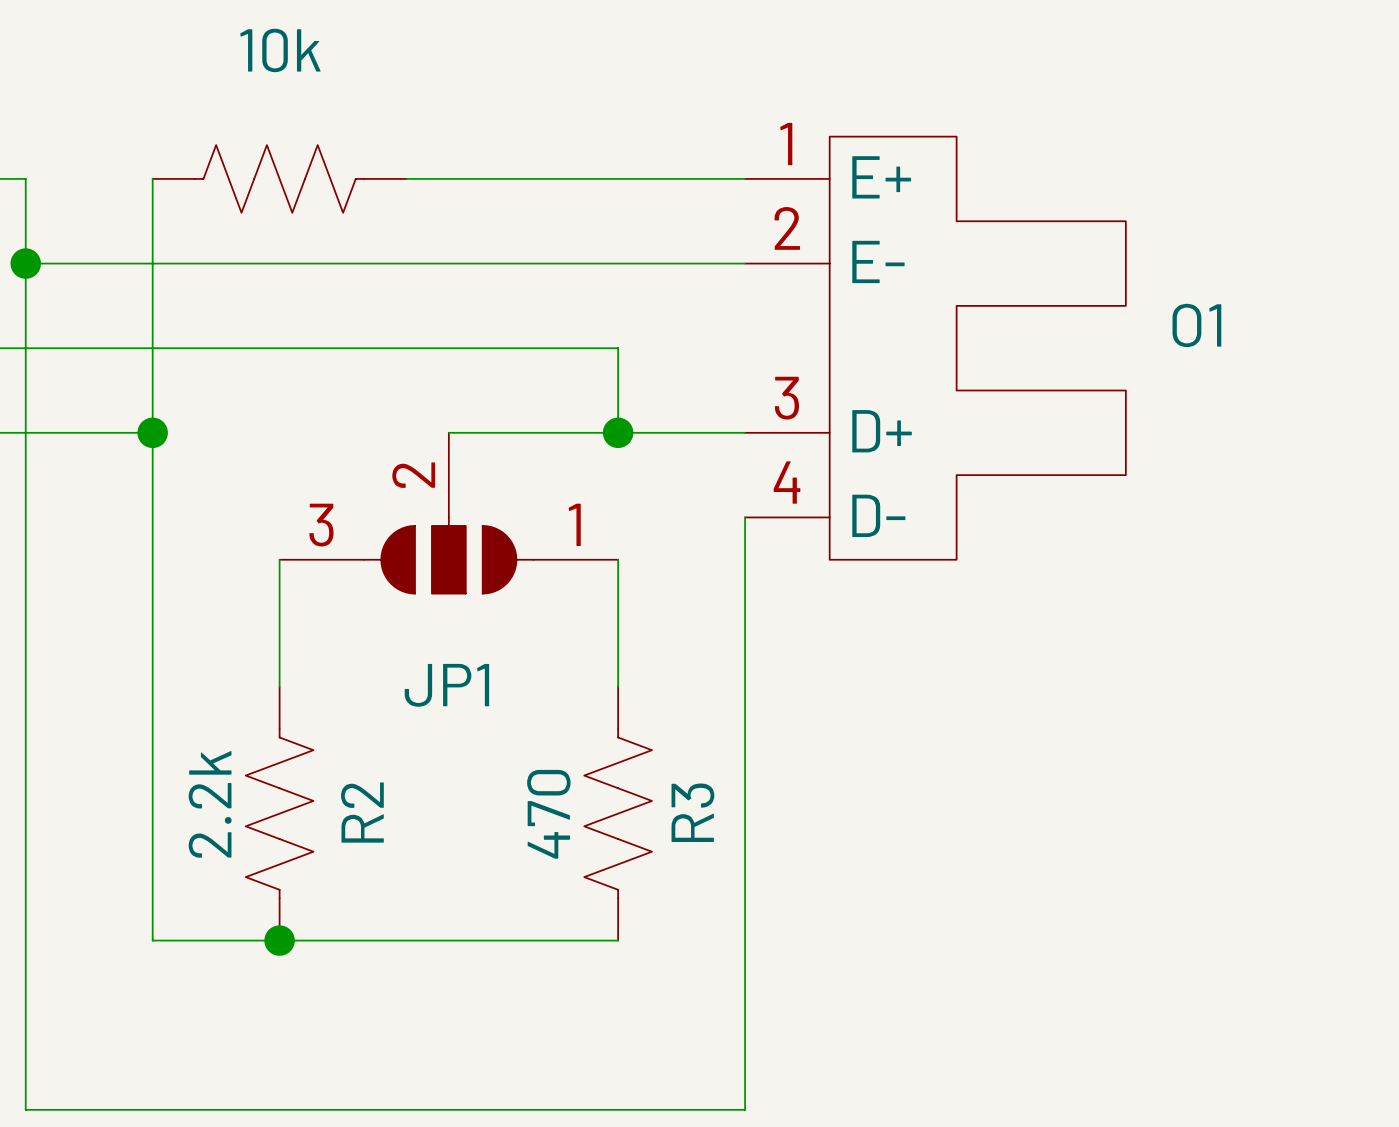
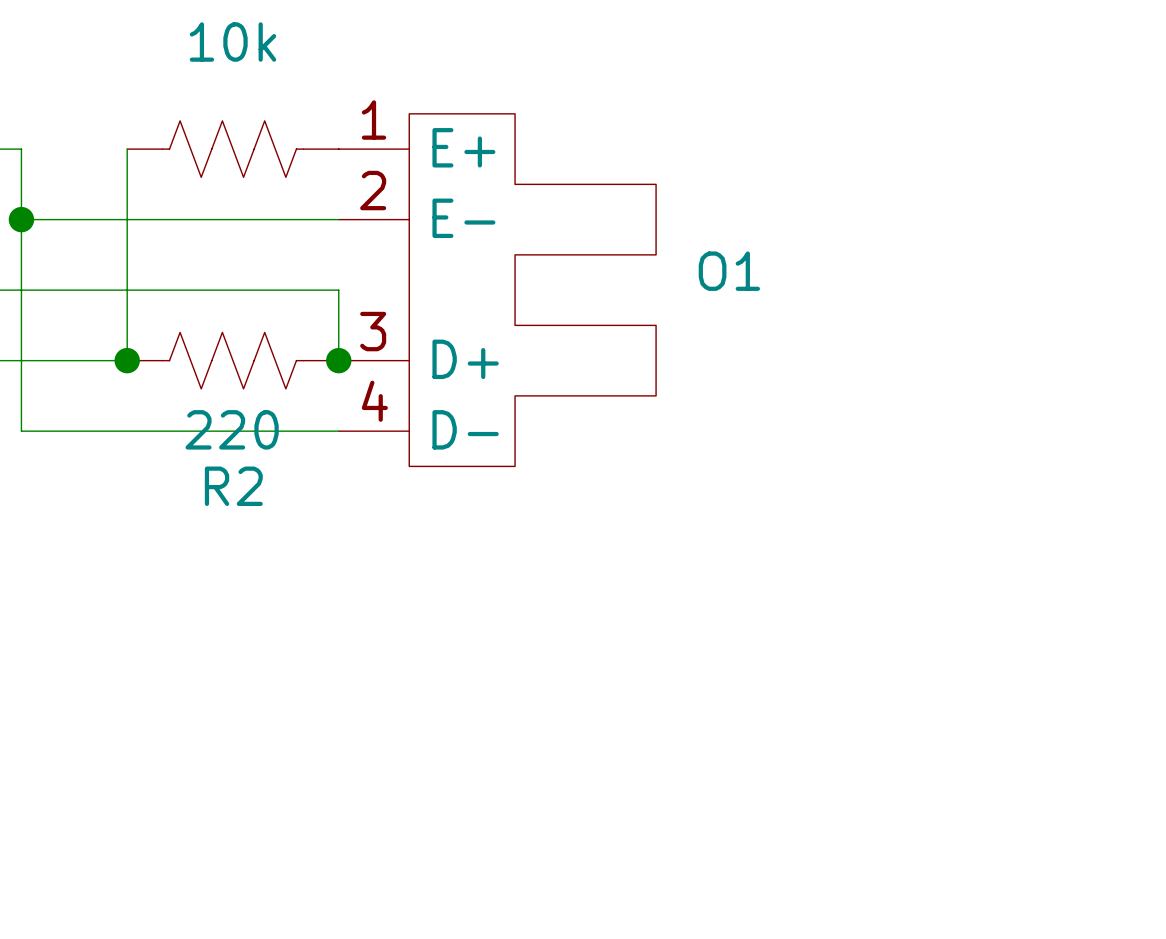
wire: (406, 178) (745, 178) -> none
wire: (406, 263) (745, 263) -> none
wire: (406, 348) (618, 348) (618, 432) -> (338, 290) (338, 360)
O1 position: (935, 348) -> (497, 290)
wire: (152, 432) (152, 940) (618, 940) -> none
junction: none -> (338, 360)
wire: (448, 432) (745, 432) -> none
junction: (618, 432) -> none
JP1: (448, 513) -> none
wire: (25, 517) (25, 1109) (745, 1109) (745, 517) -> (21, 431) (338, 431)
wire: (279, 559) (279, 686) -> none
wire: (618, 559) (618, 686) -> none
R2 value: 2.2k (210, 804) -> 220 (232, 429)
R2 name position: R2 (362, 812) -> R2 (233, 486)
R2 rotation: 0° (279, 813) -> 90° clockwise (232, 360)
R2 position: (279, 813) -> (232, 360)
R3: 470 (618, 813) -> none
junction: (279, 940) -> none

